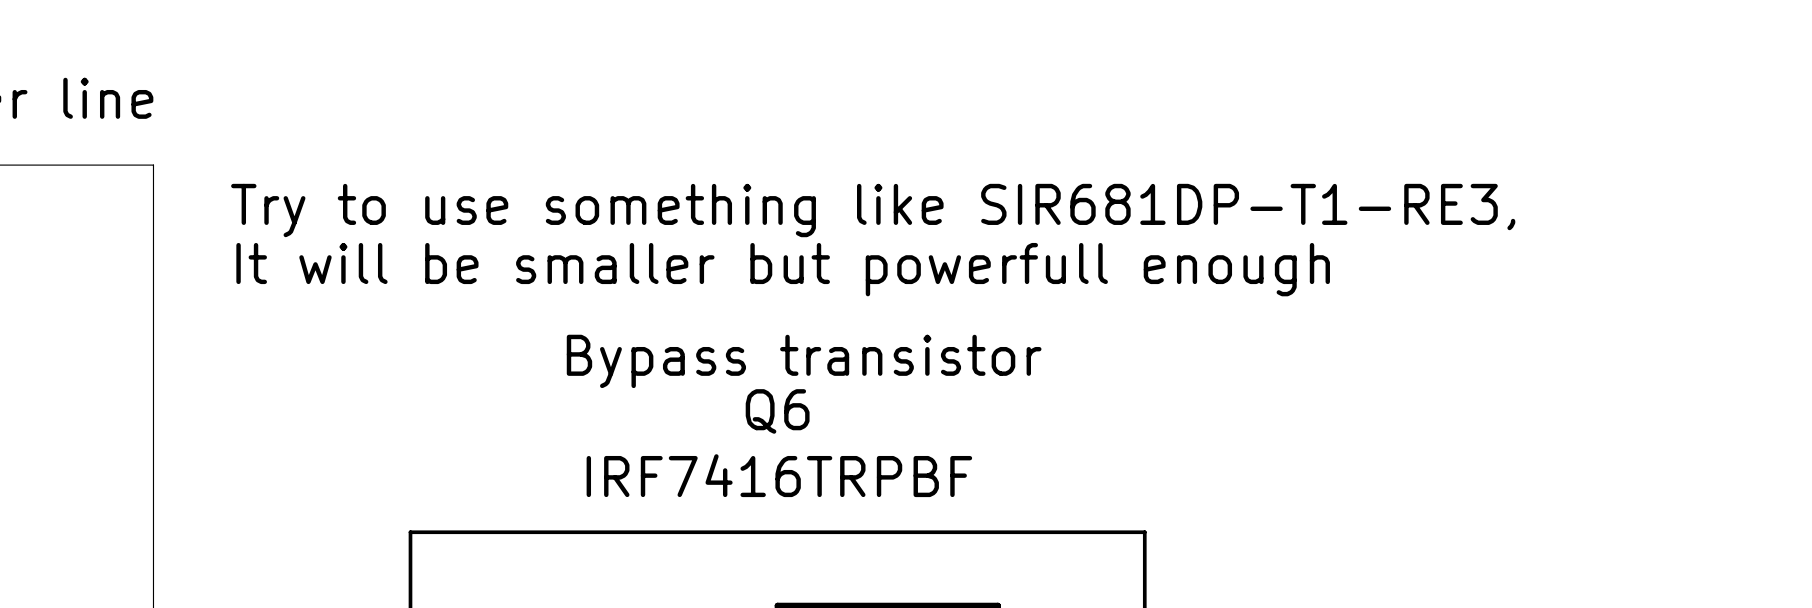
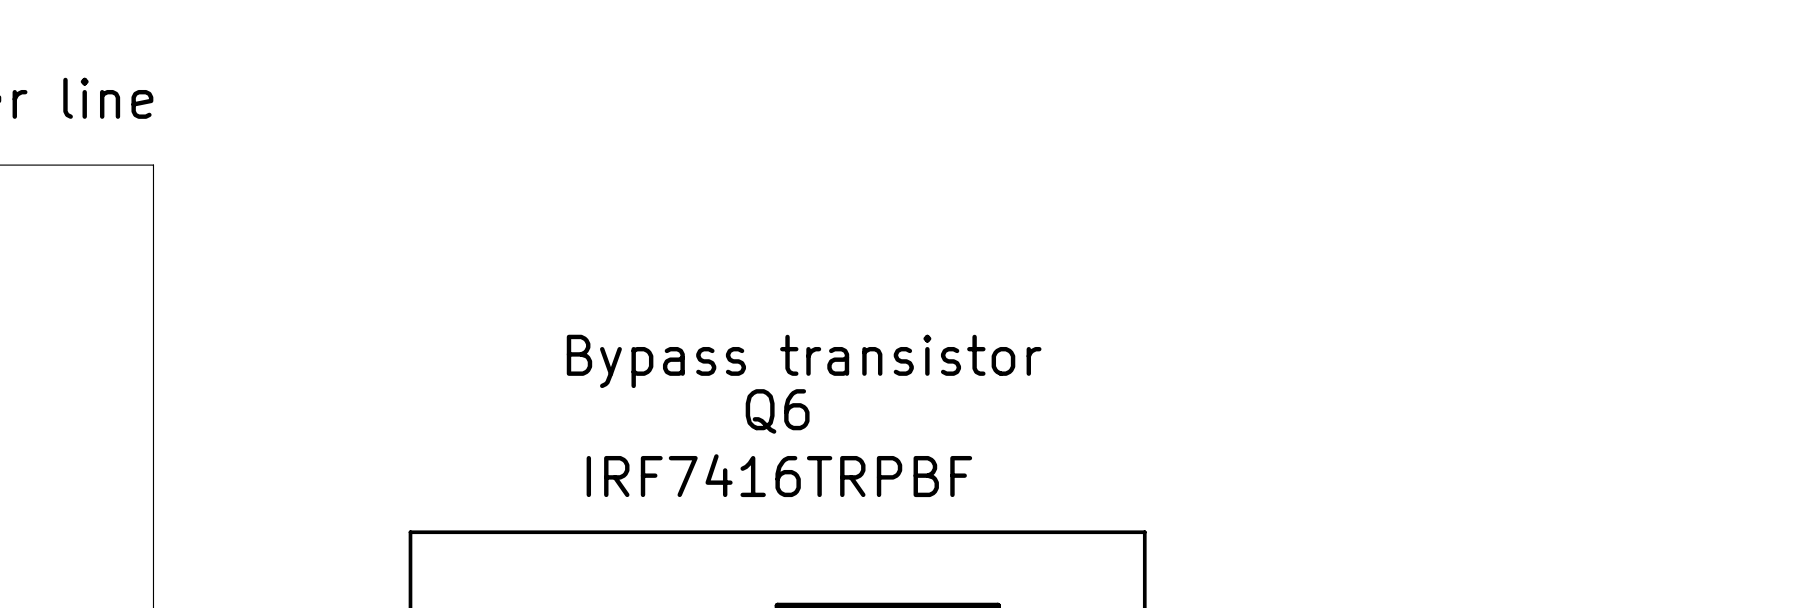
text: Try to use something like SIR681DP-T1-RE3, (873, 210) -> none
text: It will be smaller but powerfull enough (783, 269) -> none

